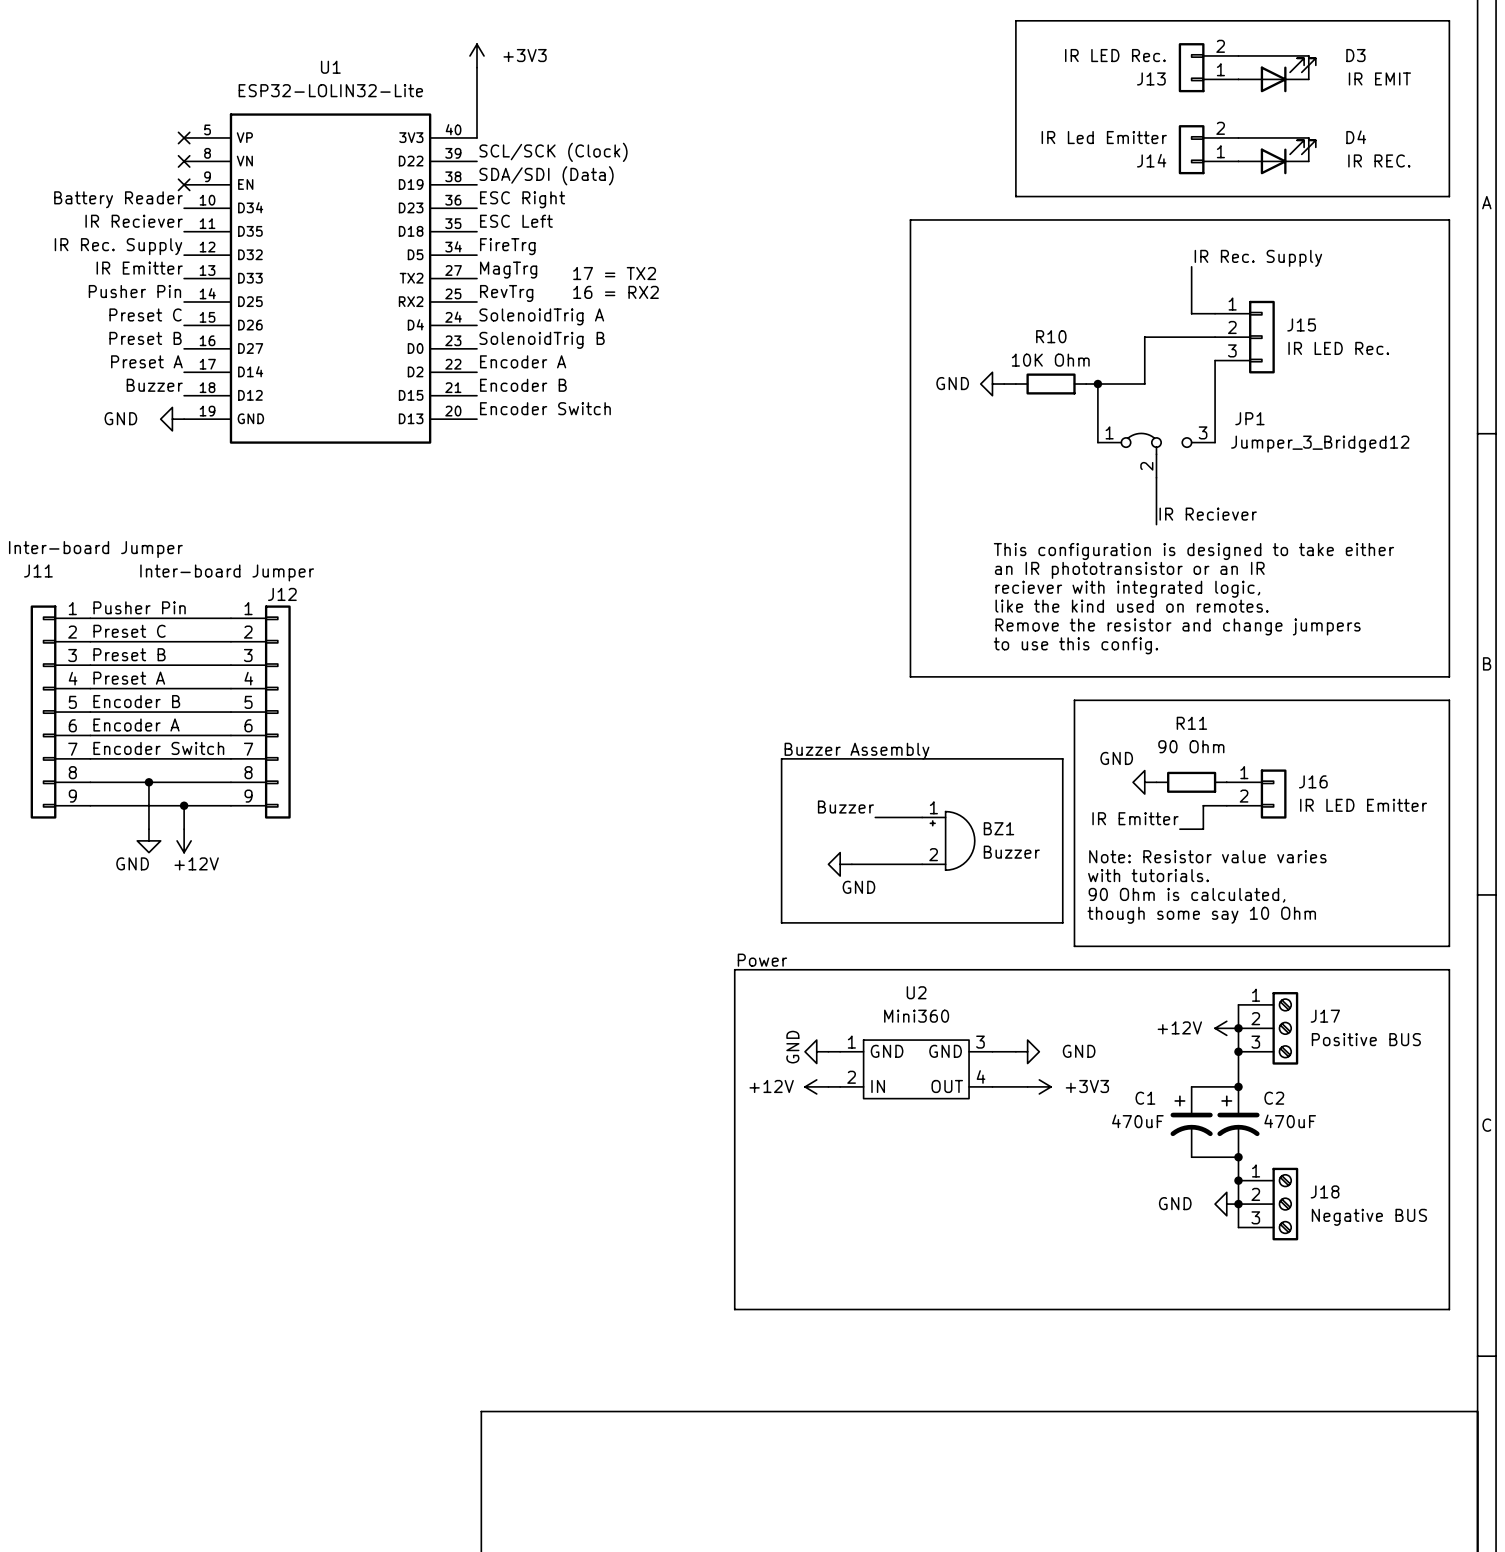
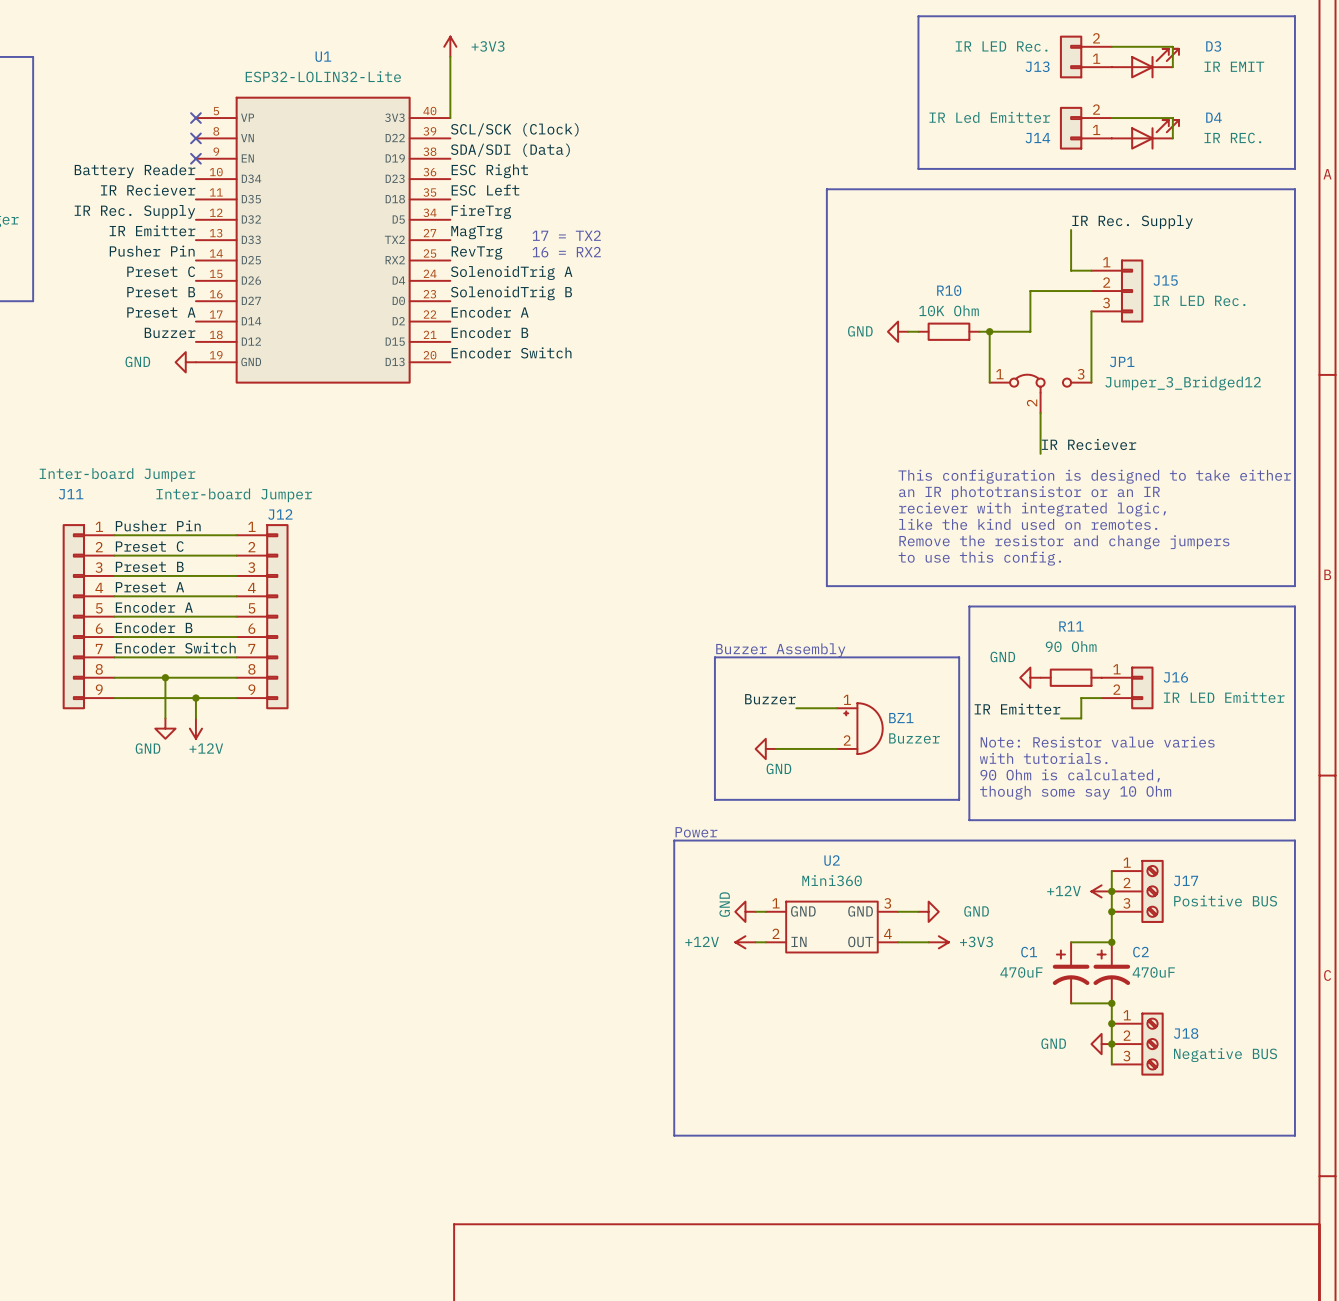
label: Encoder B (136, 701) -> Encoder A (154, 607)
label: Encoder A (136, 725) -> Encoder B (154, 627)

